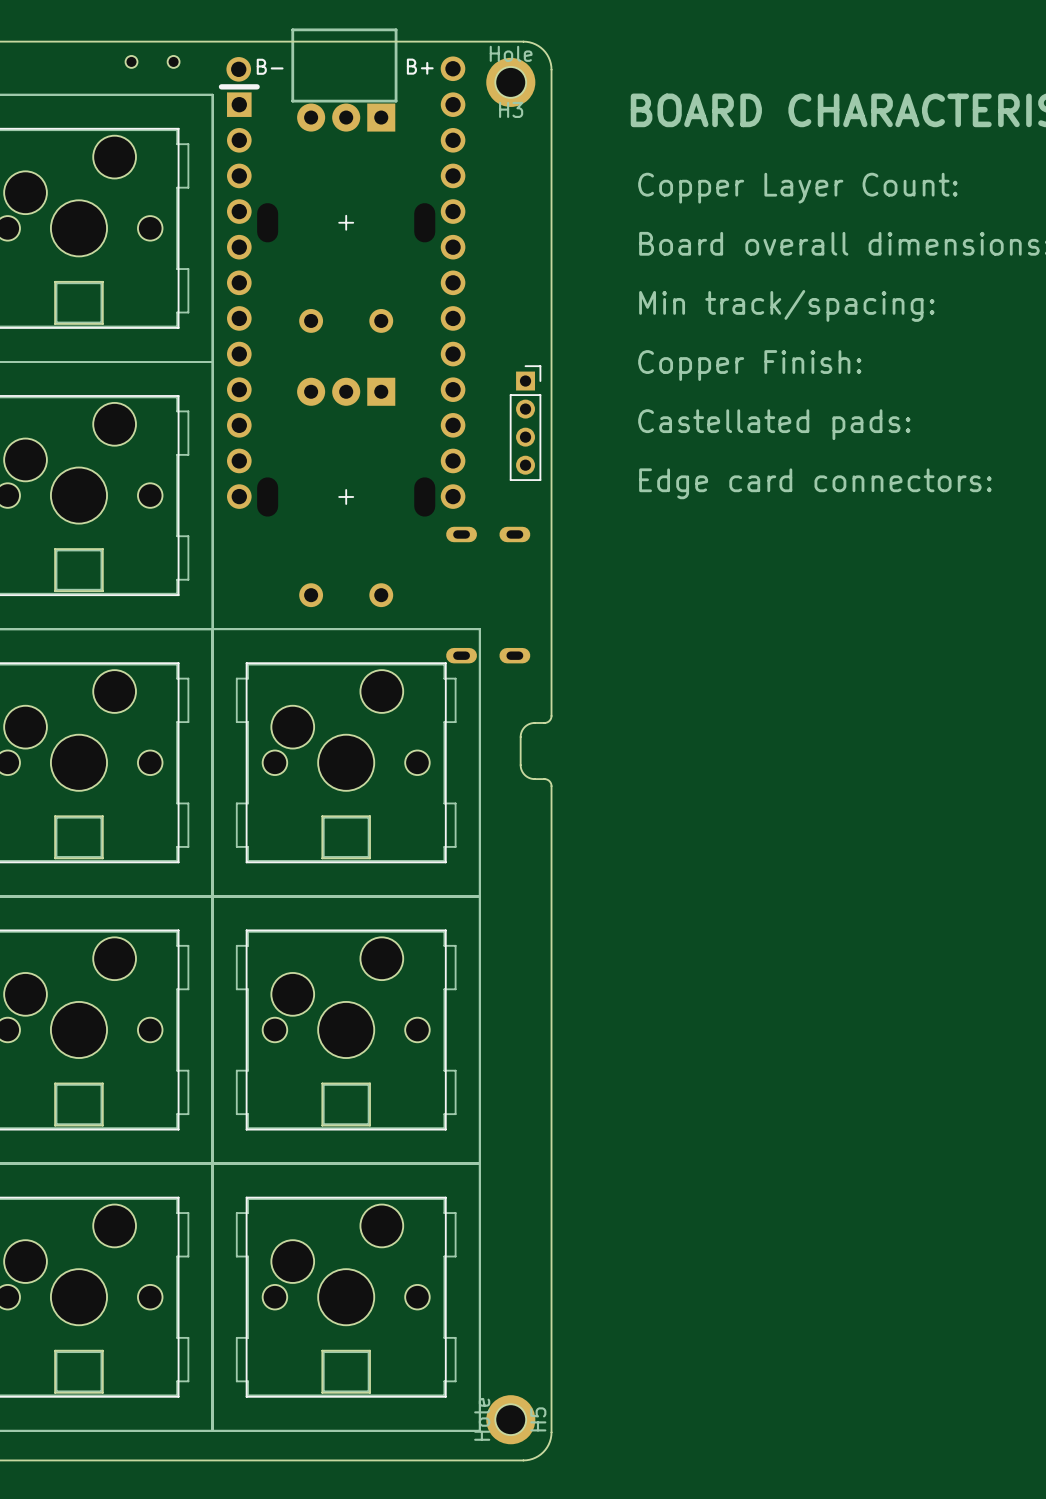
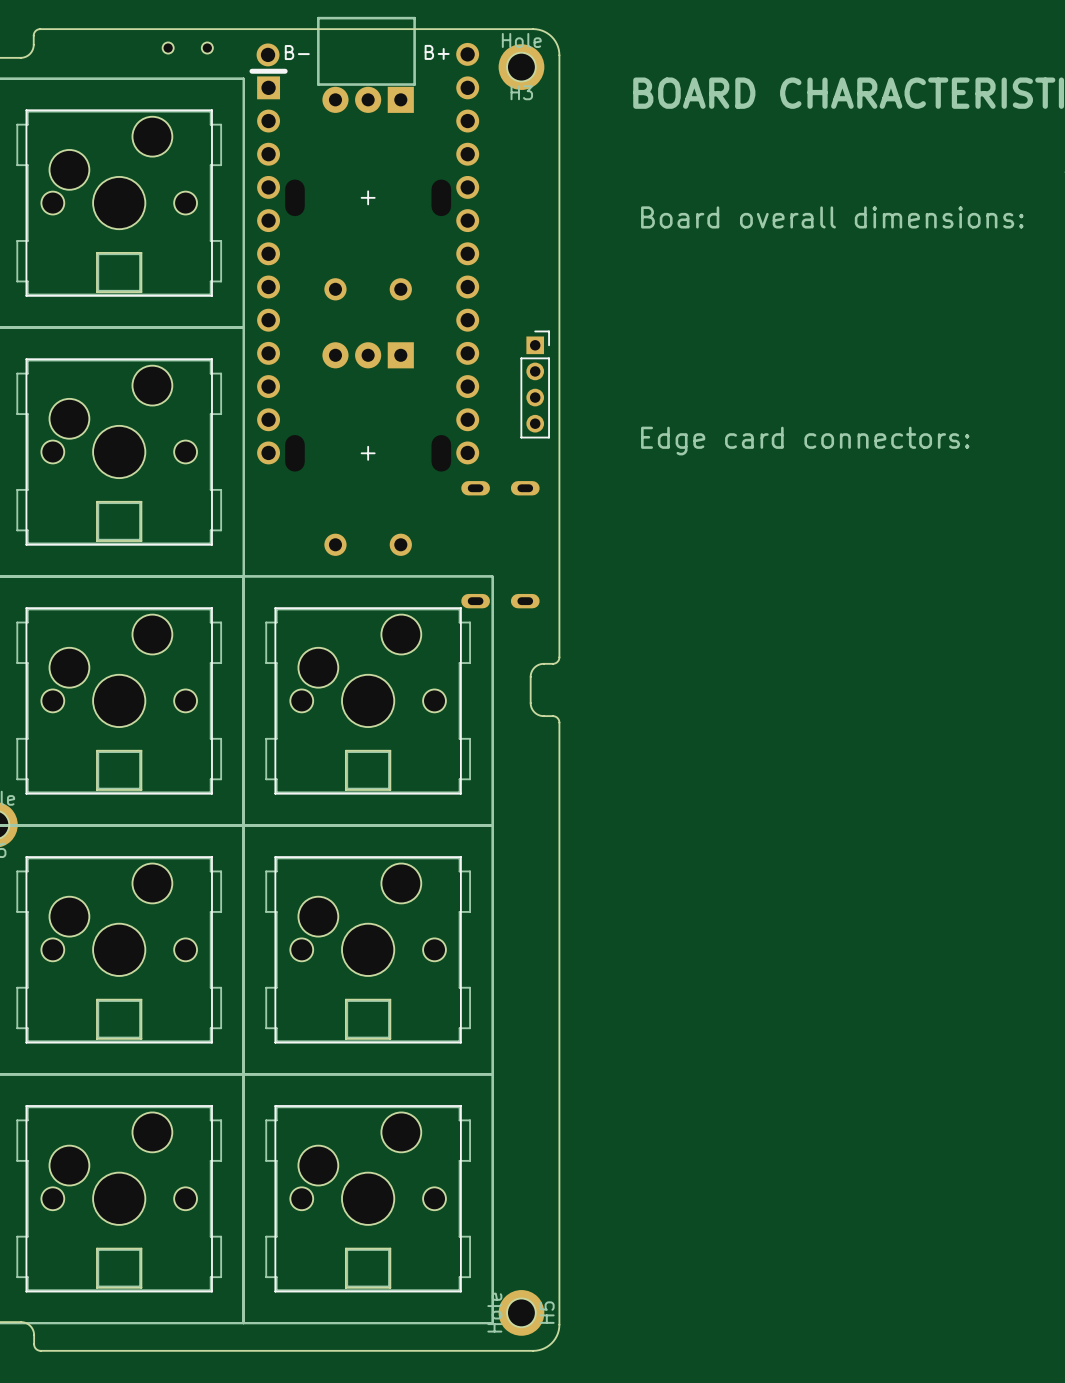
text: Copper Layer Count: (797, 188) -> none
text: Min track/spacing: (786, 305) -> none
text: Copper Finish: (749, 365) -> none
text: Castellated pads: (774, 424) -> none

